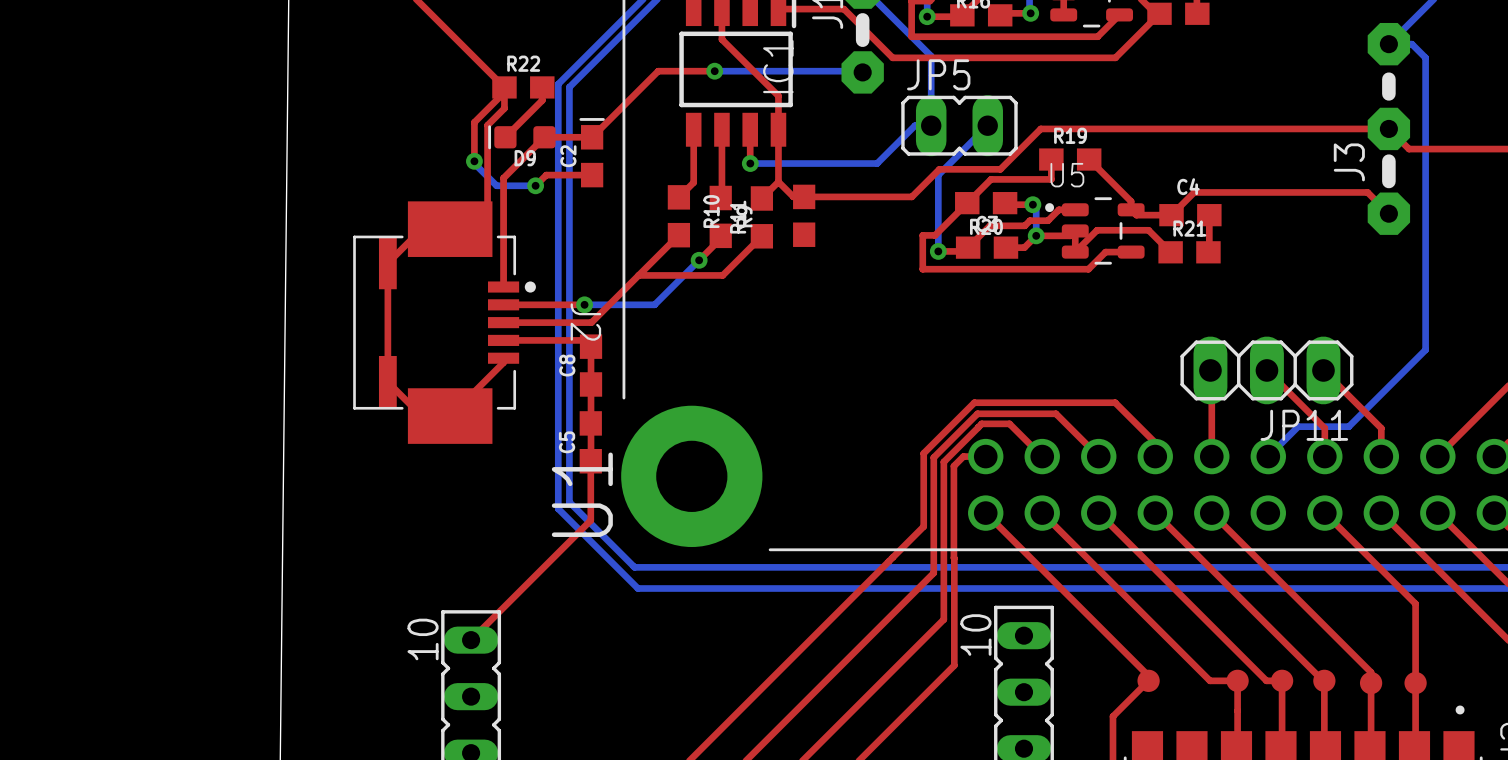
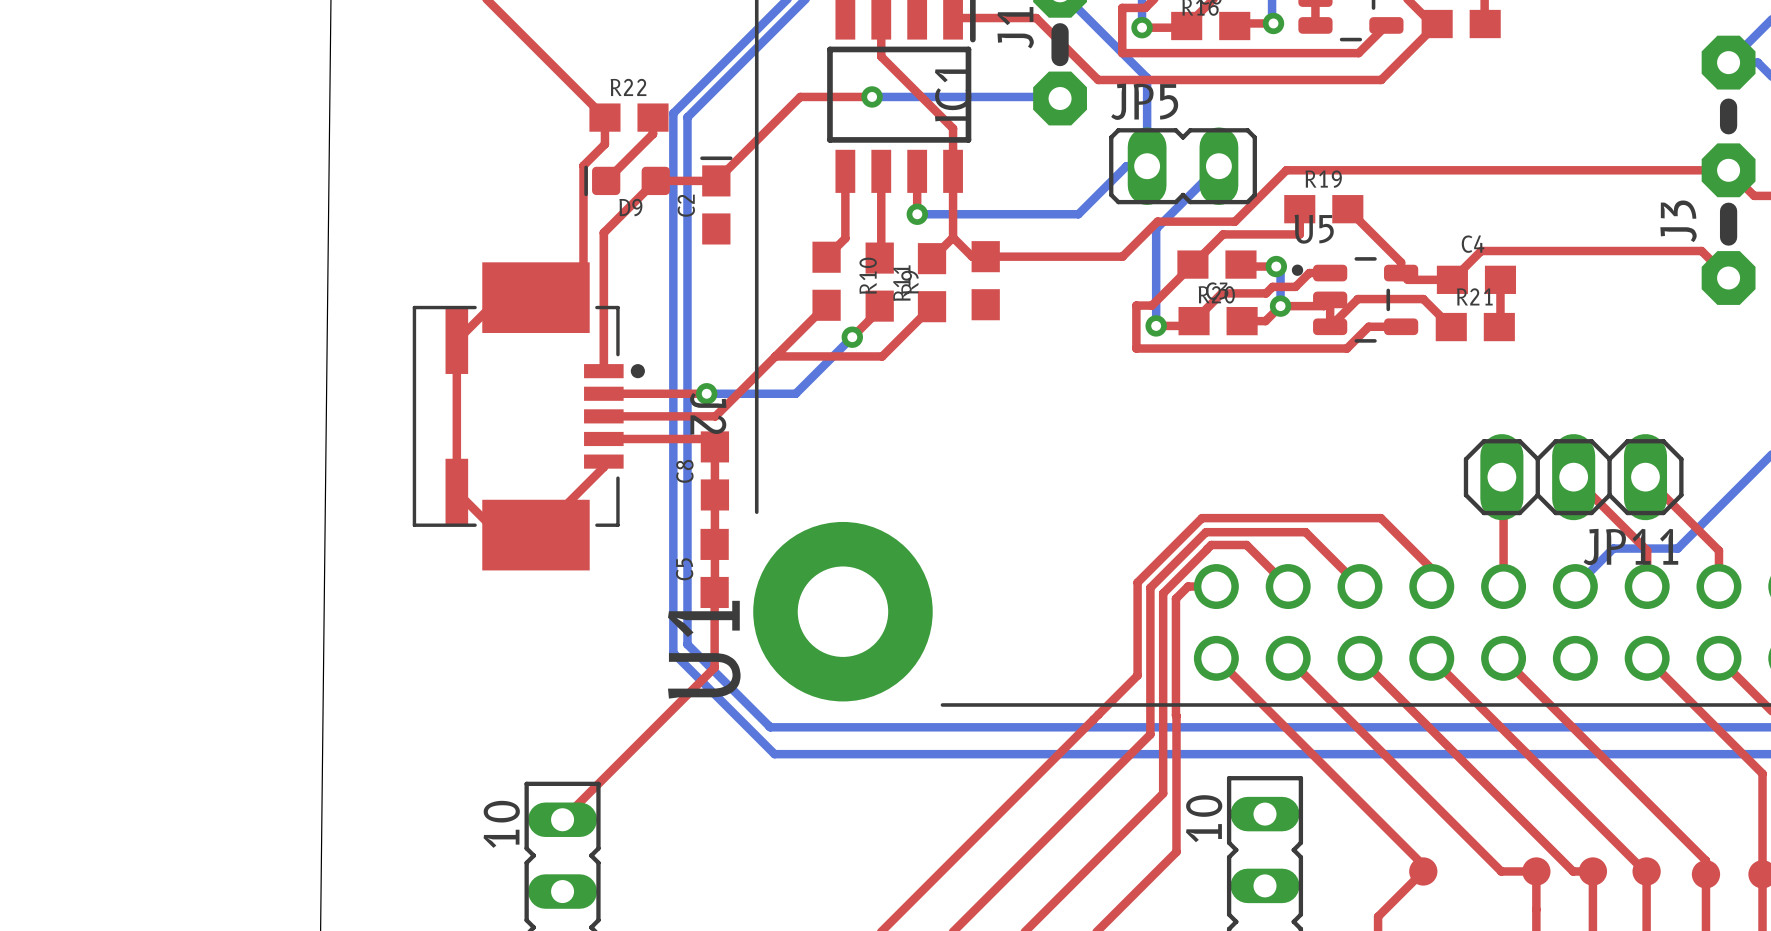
top track: (504, 92) (474, 122) (474, 161) -> none
bottom track: (474, 161) (496, 185) (535, 185) -> none
via: (474, 161) -> none
top track: (592, 175) (546, 175) (535, 185) -> none
via: (535, 185) -> none

